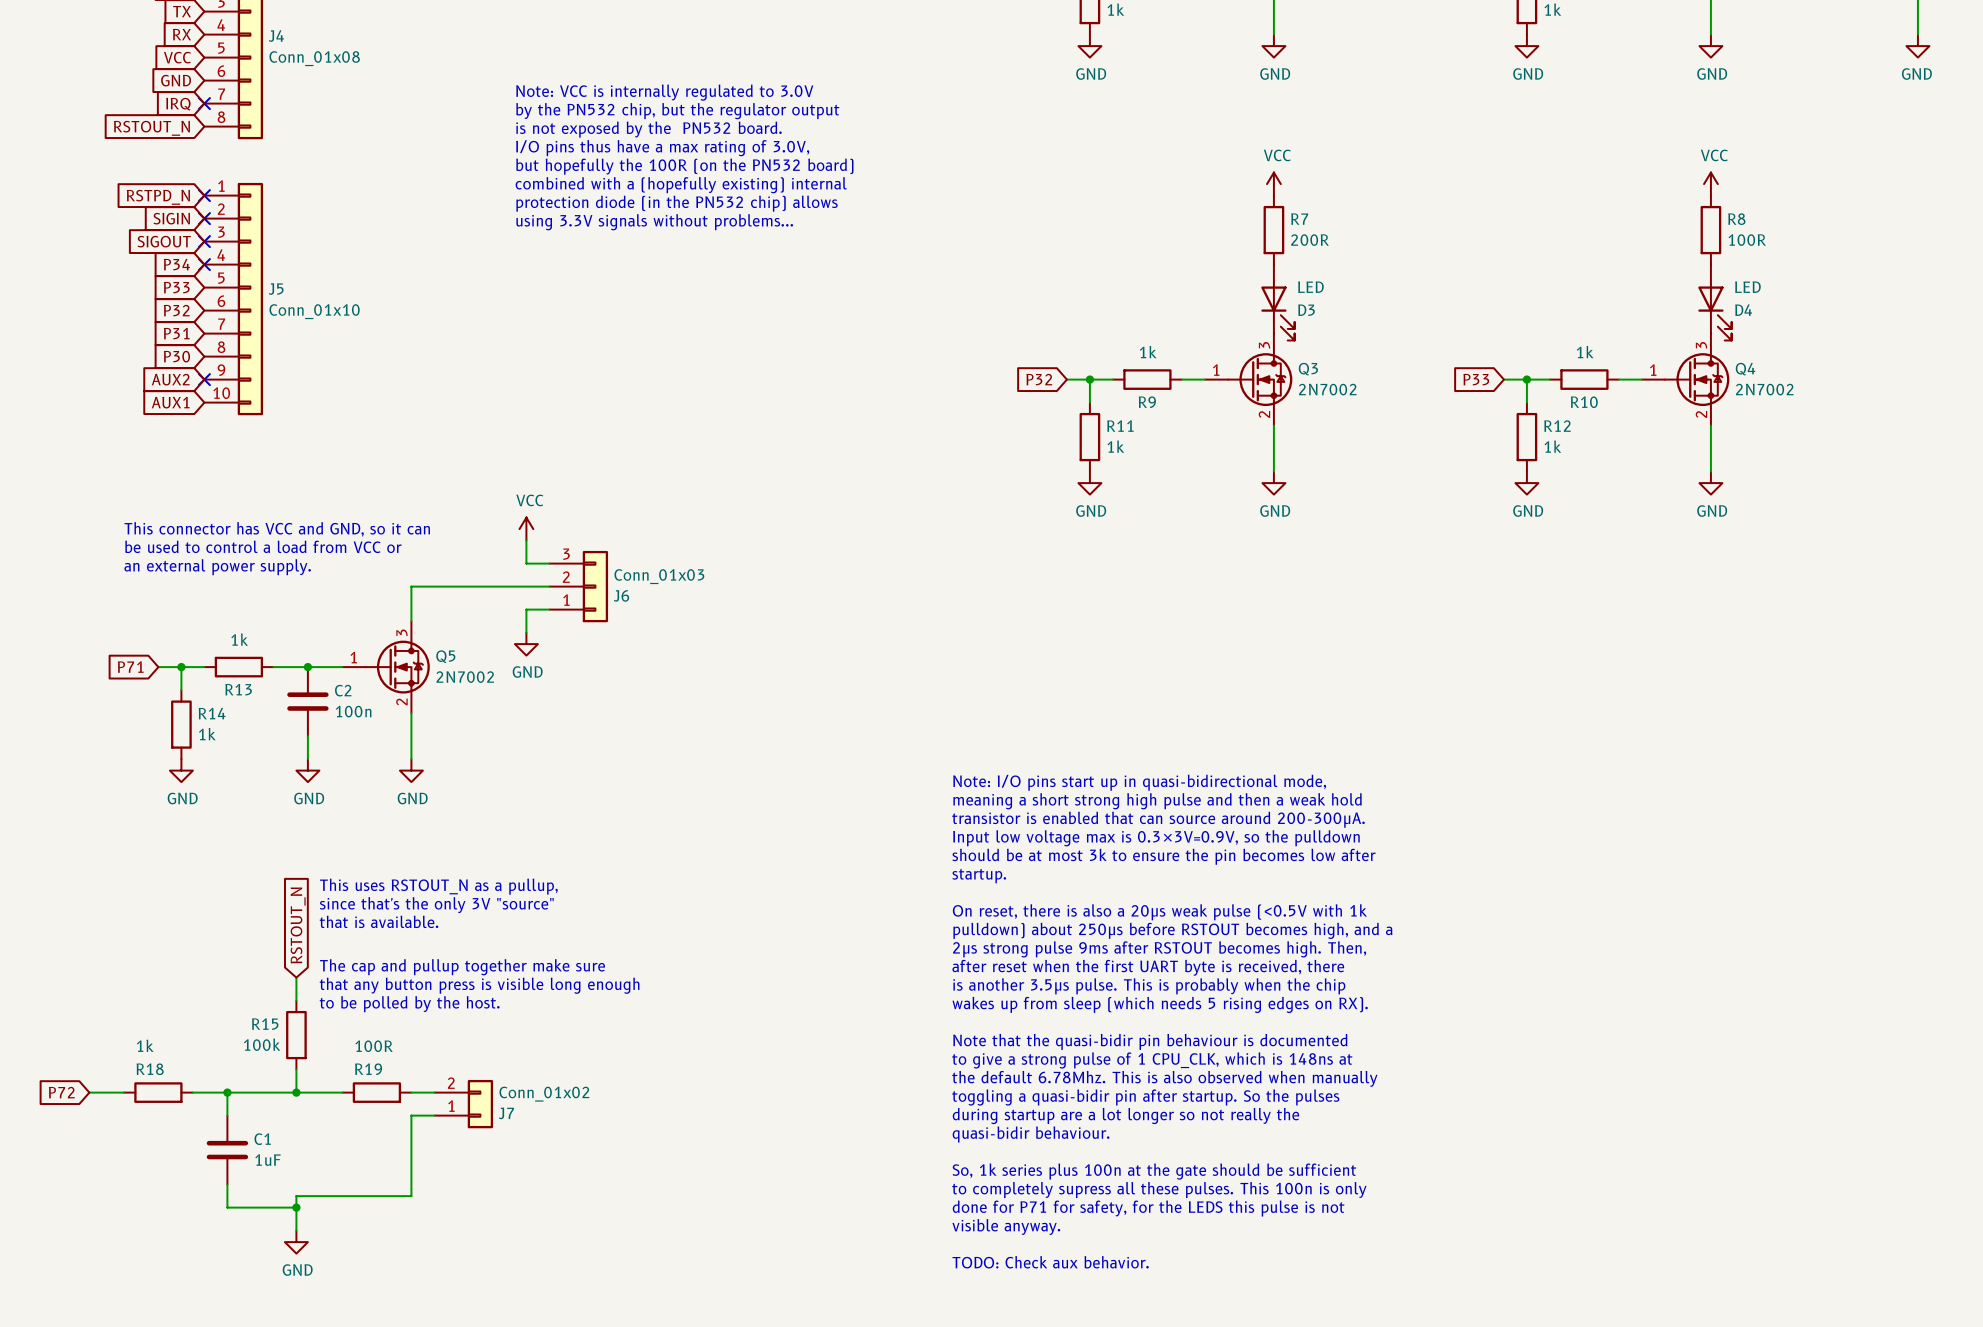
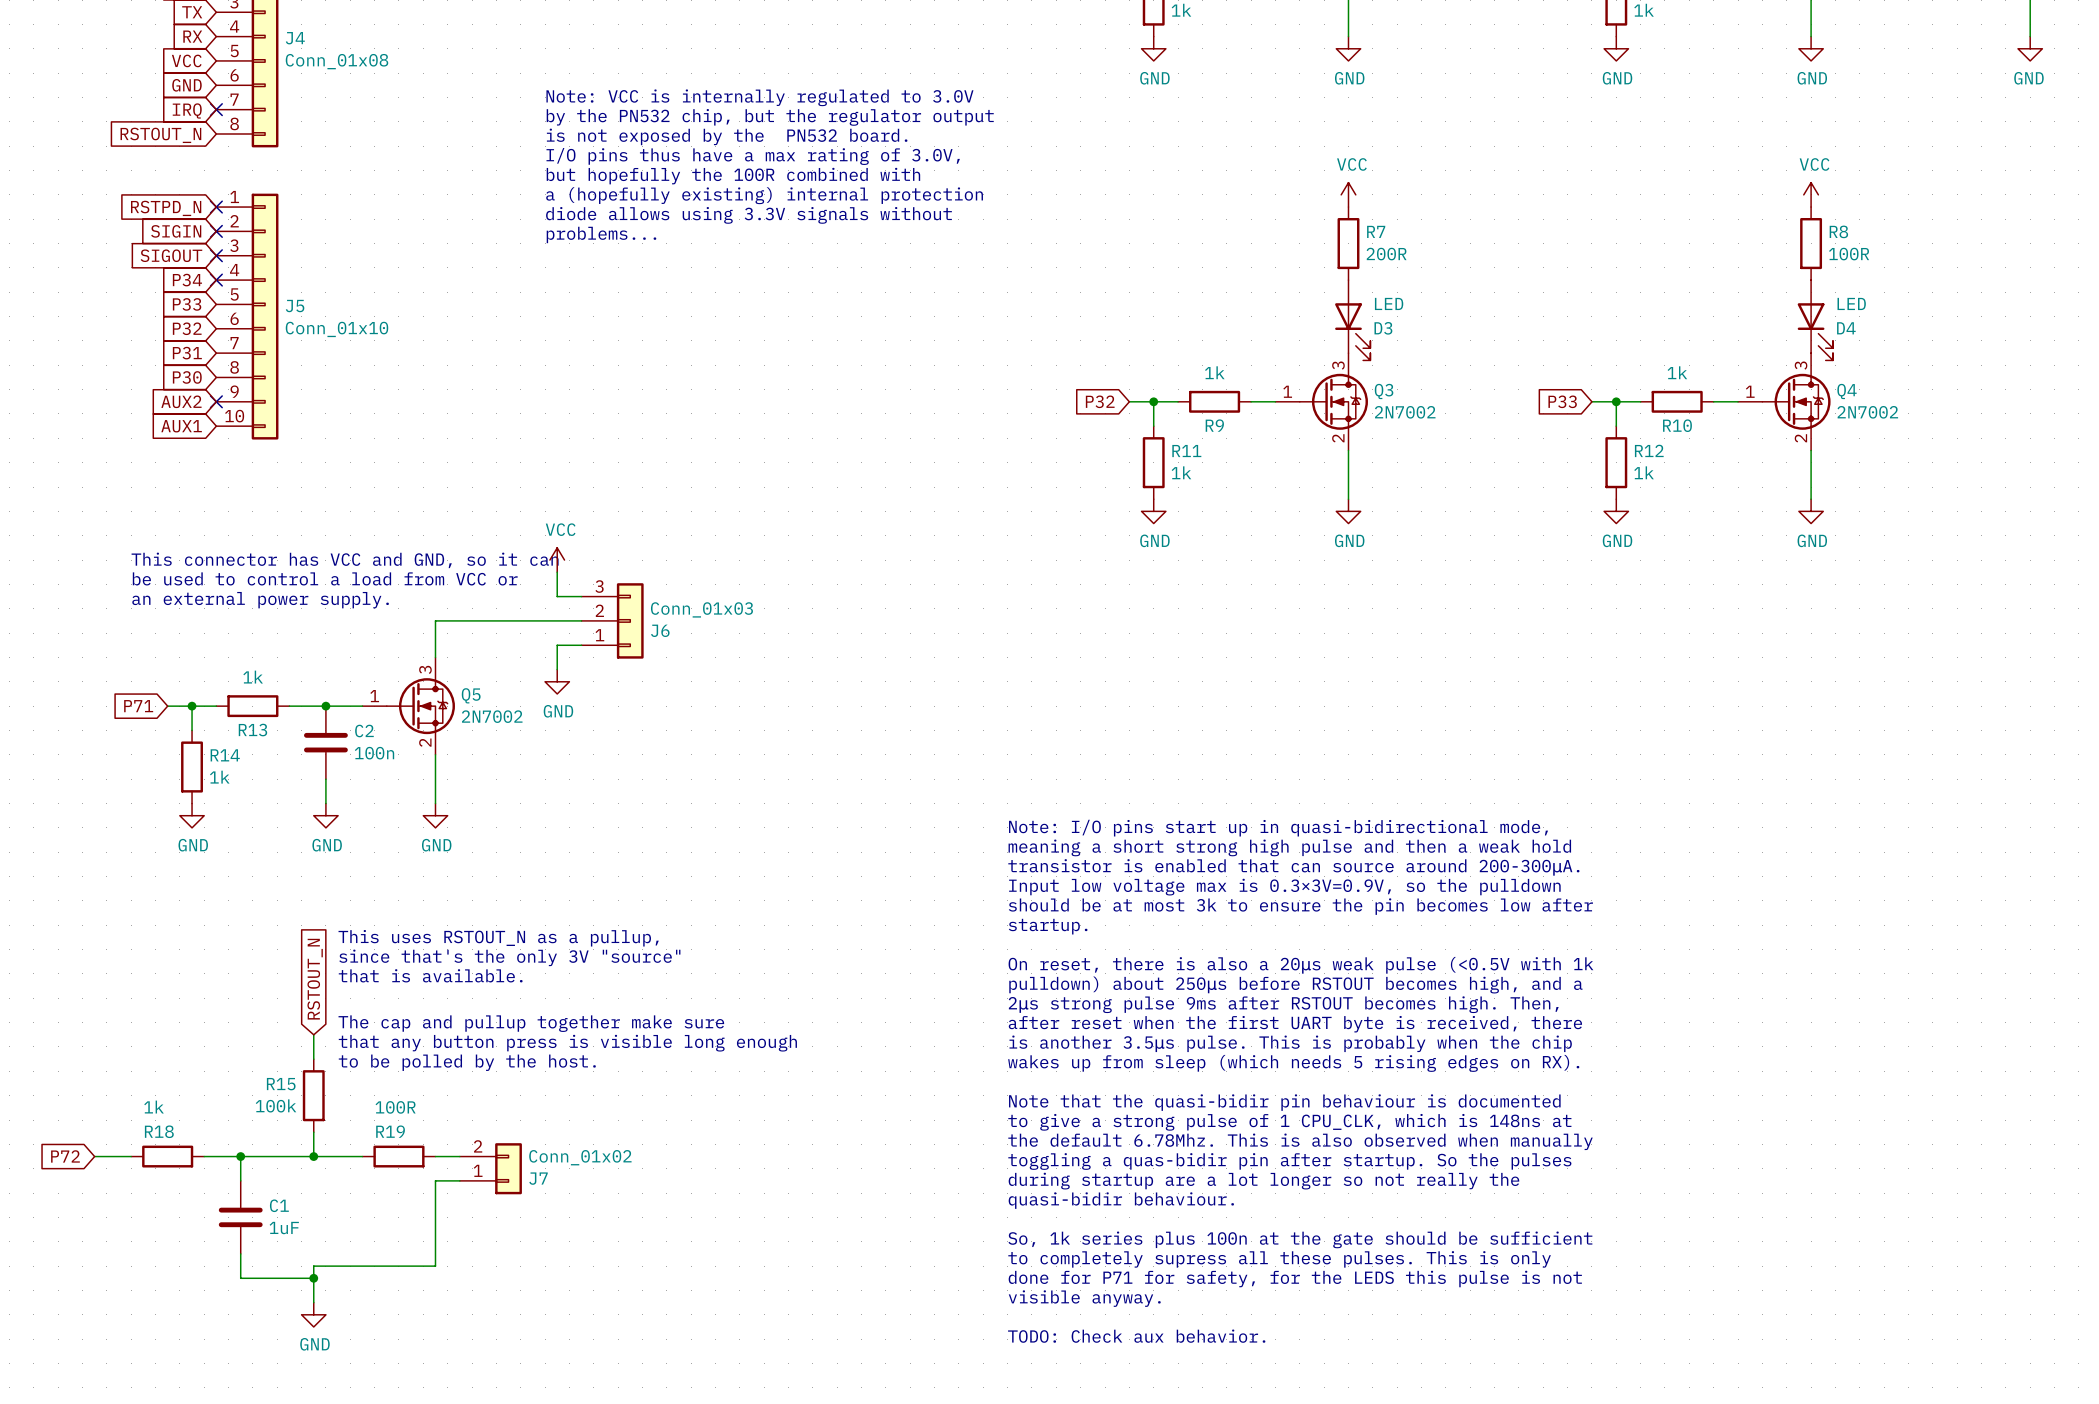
text: but hopefully the 100R (on the PN532 board) (684, 166) -> but hopefully the 100R combined with (733, 176)
text: combined with a (hopefully existing) internal (681, 185) -> a (hopefully existing) internal protection (764, 195)
text: protection diode (in the PN532 chip) allows (677, 203) -> diode allows using 3.3V signals without (748, 215)
text: using 3.3V signals without problems... (654, 222) -> problems... (601, 234)
text: toggling a quasi-bidir pin after startup. So the pulses (1145, 1097) -> toggling a quas-bidir pin after startup. So the pulses (1289, 1161)
text: to completely supress all these pulses. This 100n is only (1159, 1190) -> to completely supress all these pulses. This is only (1279, 1259)

